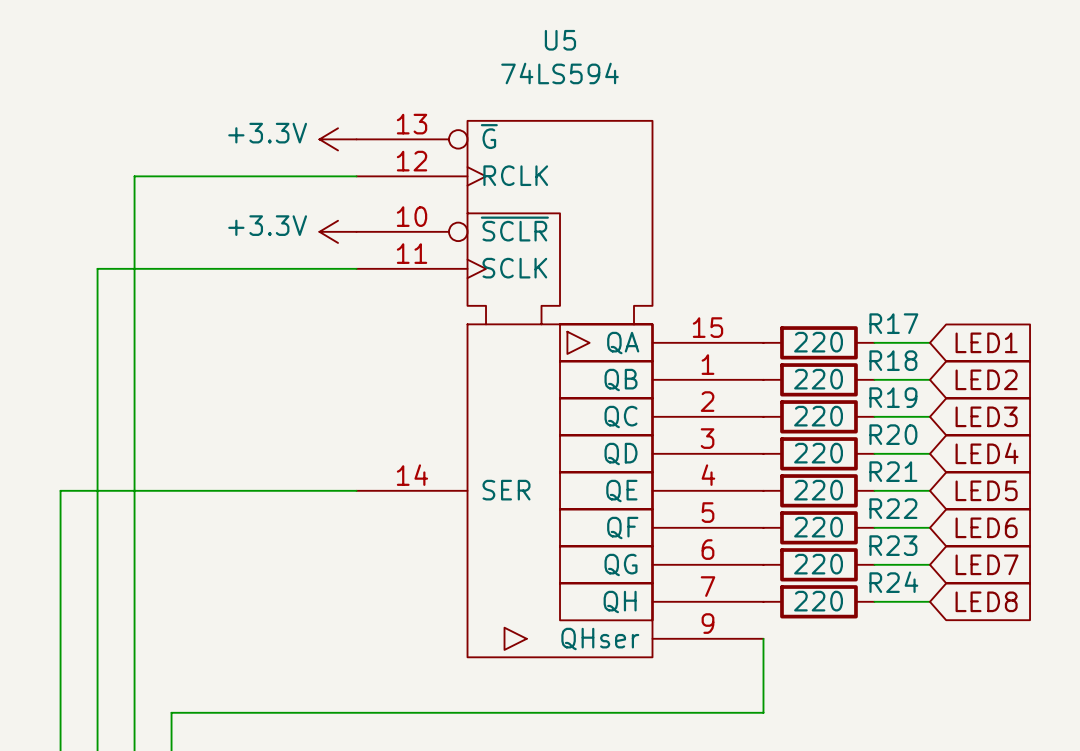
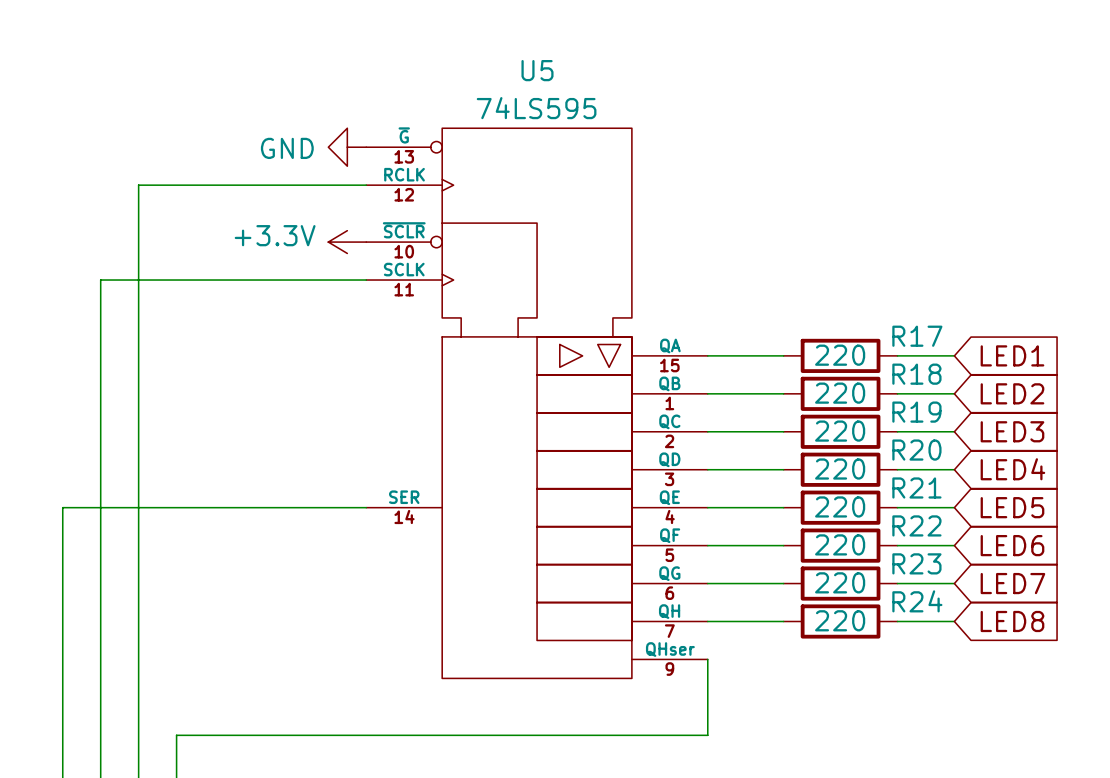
U5 value: 74LS594 (560, 73) -> 74LS595 (536, 108)
U5 symbol: [356, 120, 764, 658] -> [366, 128, 708, 679]
power symbol: +3.3V (338, 139) -> GND (347, 147)
wire: (763, 638) (763, 712) (689, 712) -> (707, 659) (707, 735)

